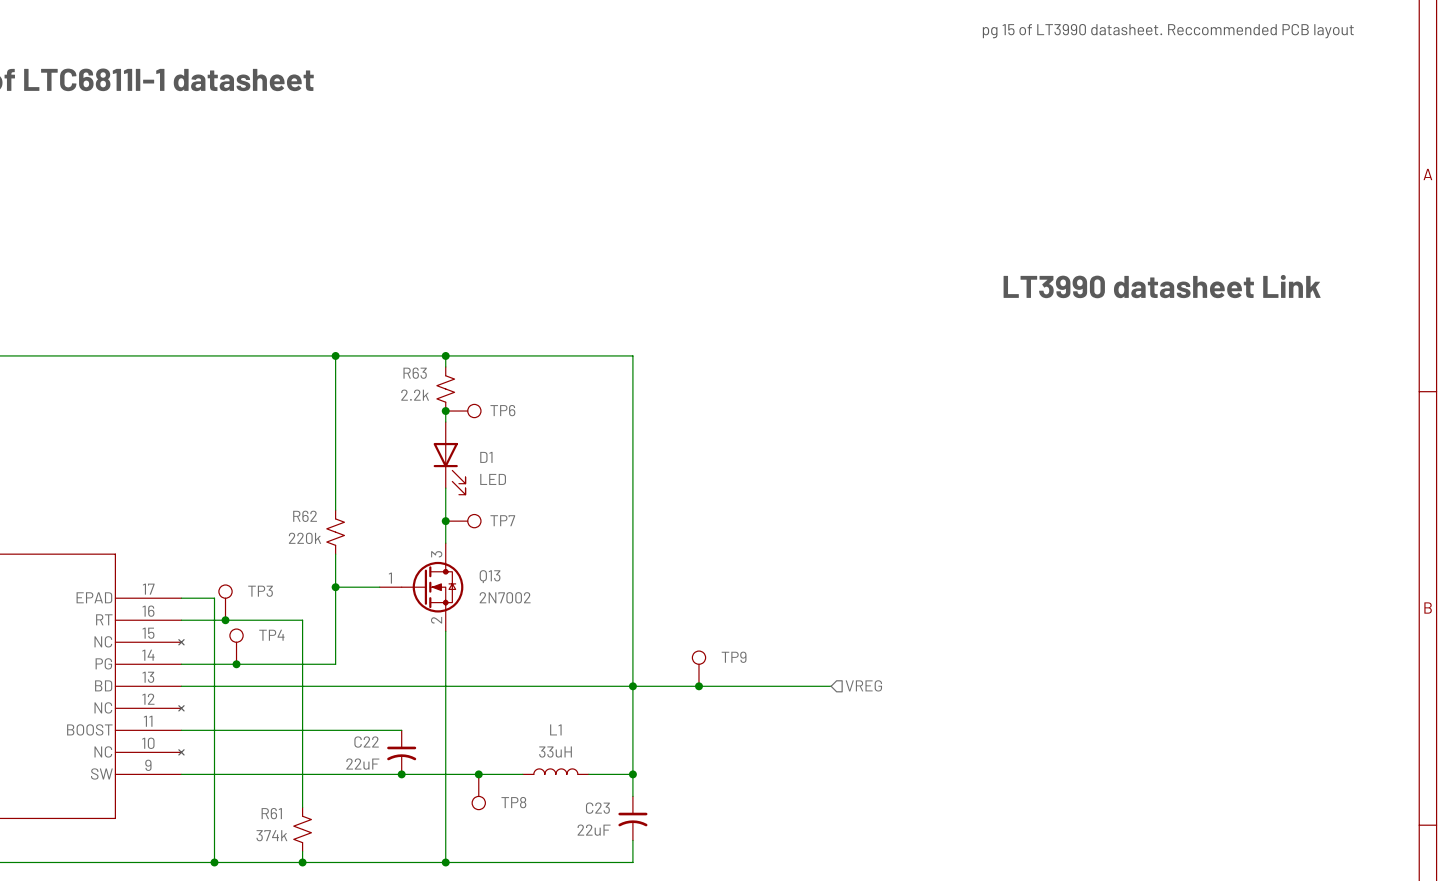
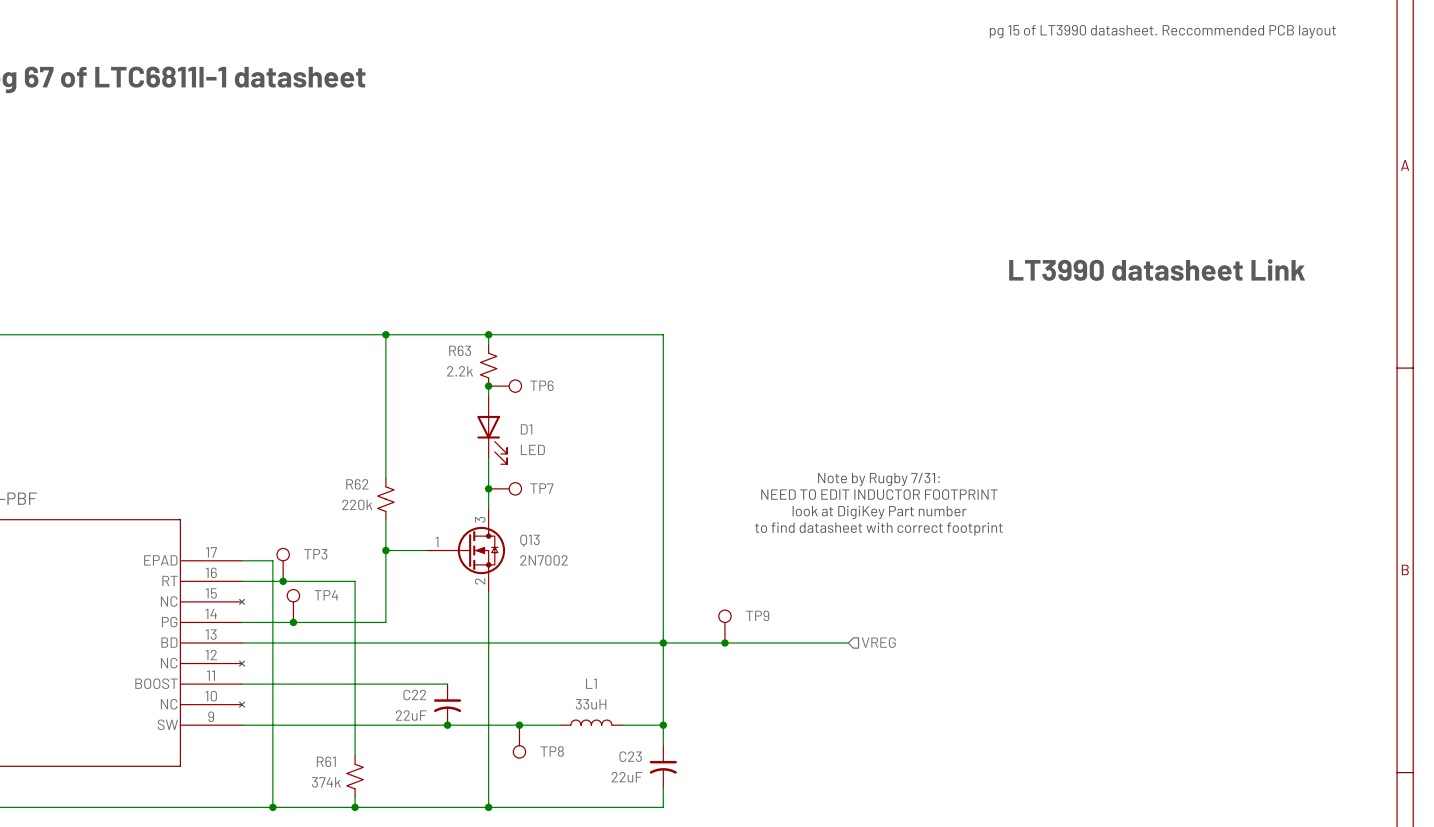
text: none -> Note by Rugby 7/31: (878, 479)
text: none -> NEED TO EDIT INDUCTOR FOOTPRINT (879, 494)
text: none -> look at DigiKey Part number (879, 512)
text: none -> to find datasheet with correct footprint (878, 529)

